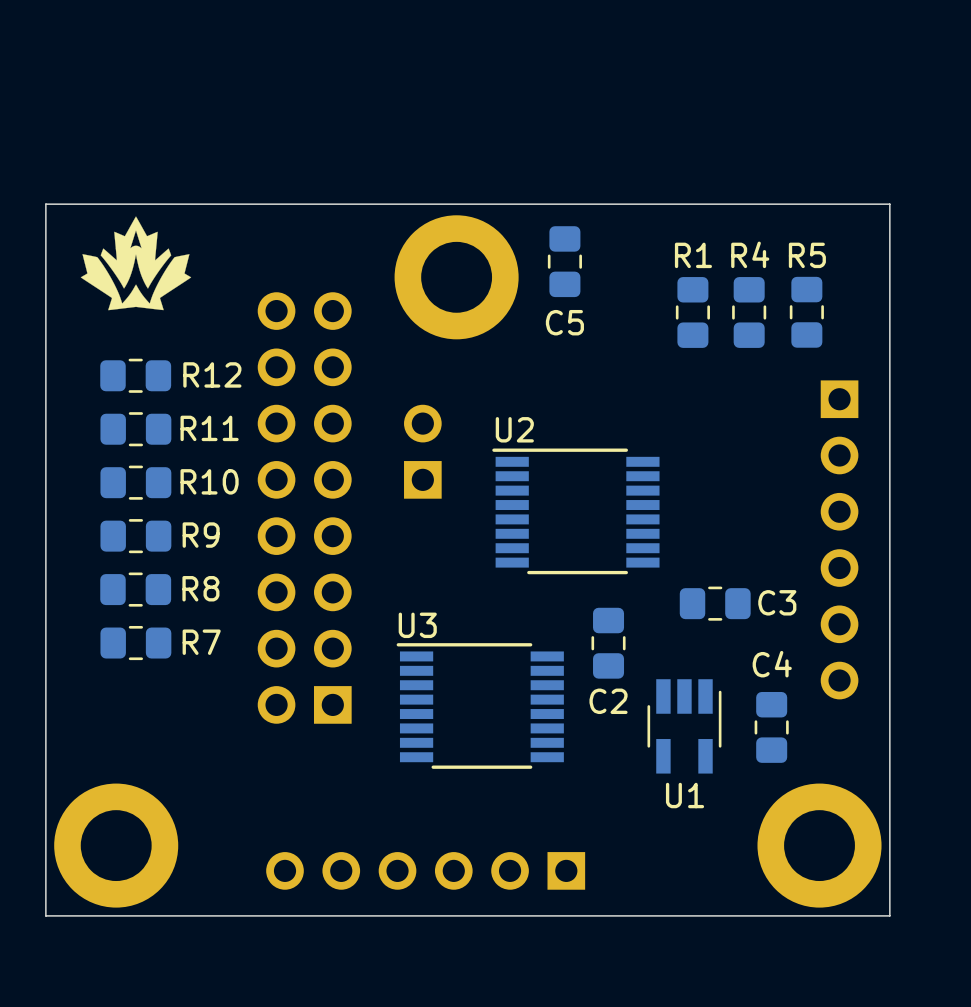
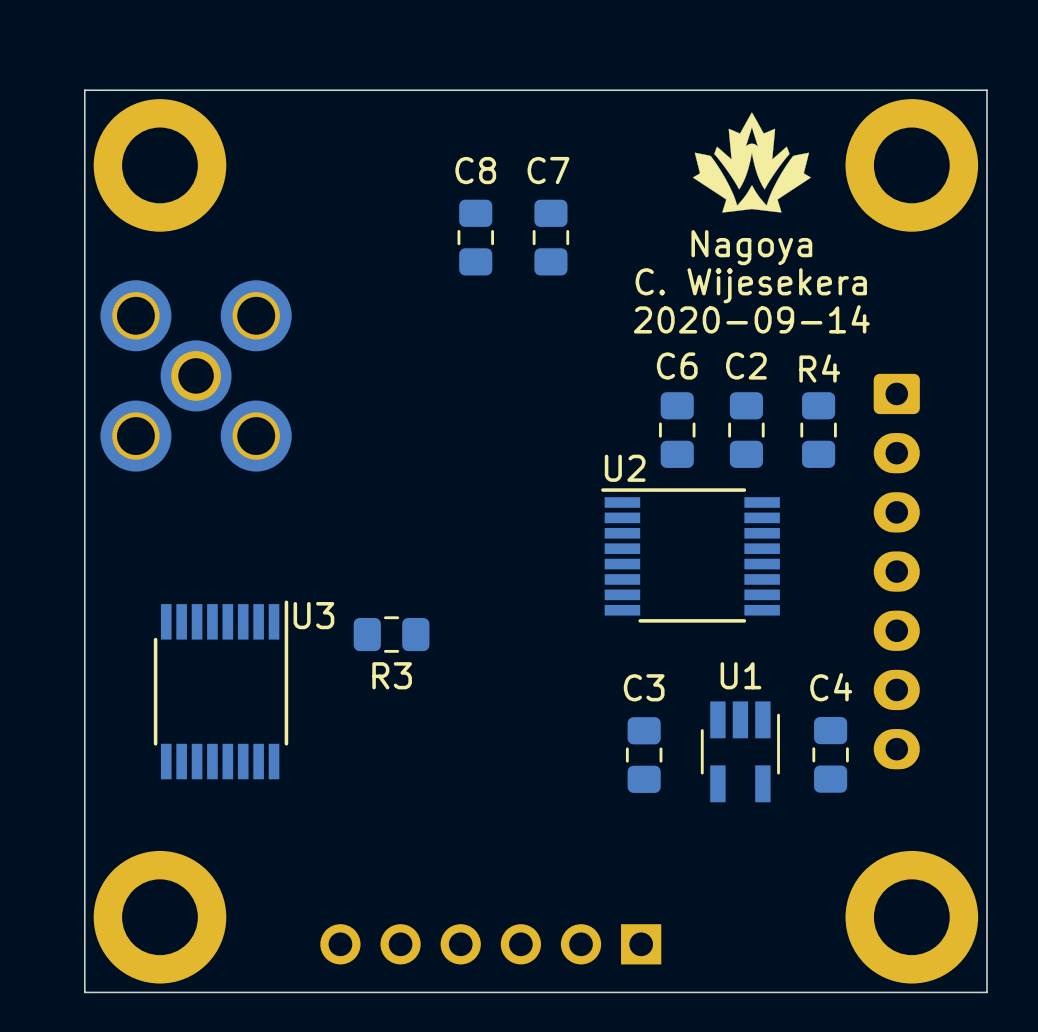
part: none -> (159, 165)
part: none -> (911, 165)
board edge: (889, 204) (45, 204) -> (987, 231) (987, 90) (84, 90) (84, 231)
C8: none -> (475, 237)
C7: none -> (550, 237)
text: none -> Nagoya (751, 247)
text: none -> C. Wijesekera (751, 285)
C5: (564, 261) -> none
drawing position: (135, 263) -> (751, 162)
part: (456, 277) -> none
text: none -> 2020-09-14 (751, 319)
R1: (692, 312) -> none
R4 position: (749, 312) -> (818, 430)
R5: (806, 312) -> none
part: none -> (196, 375)
R12: (135, 375) -> none
C6: none -> (677, 430)
R11: (135, 429) -> none
part: (422, 451) -> none
R10: (135, 482) -> none
part: (304, 507) -> none
U2 position: (575, 511) -> (690, 555)
part: none -> (896, 571)
R9: (135, 536) -> none
part: (839, 539) -> none
R3: none -> (391, 634)
R8: (135, 589) -> none
C3 name position: C3 (777, 602) -> C3 (644, 687)
C3 rotation: 0° (715, 603) -> 90° clockwise (644, 755)
C3 position: (715, 603) -> (644, 755)
R7: (135, 643) -> none
C2 position: (608, 643) -> (746, 430)
C2 name position: C2 (608, 701) -> C2 (746, 366)
U3 rotation: 0° (480, 705) -> 90° clockwise (221, 689)
U3 position: (480, 705) -> (221, 689)
U1 position: (684, 726) -> (740, 751)
C4 position: (771, 727) -> (830, 754)
U1 name position: U1 (685, 795) -> U1 (740, 675)

